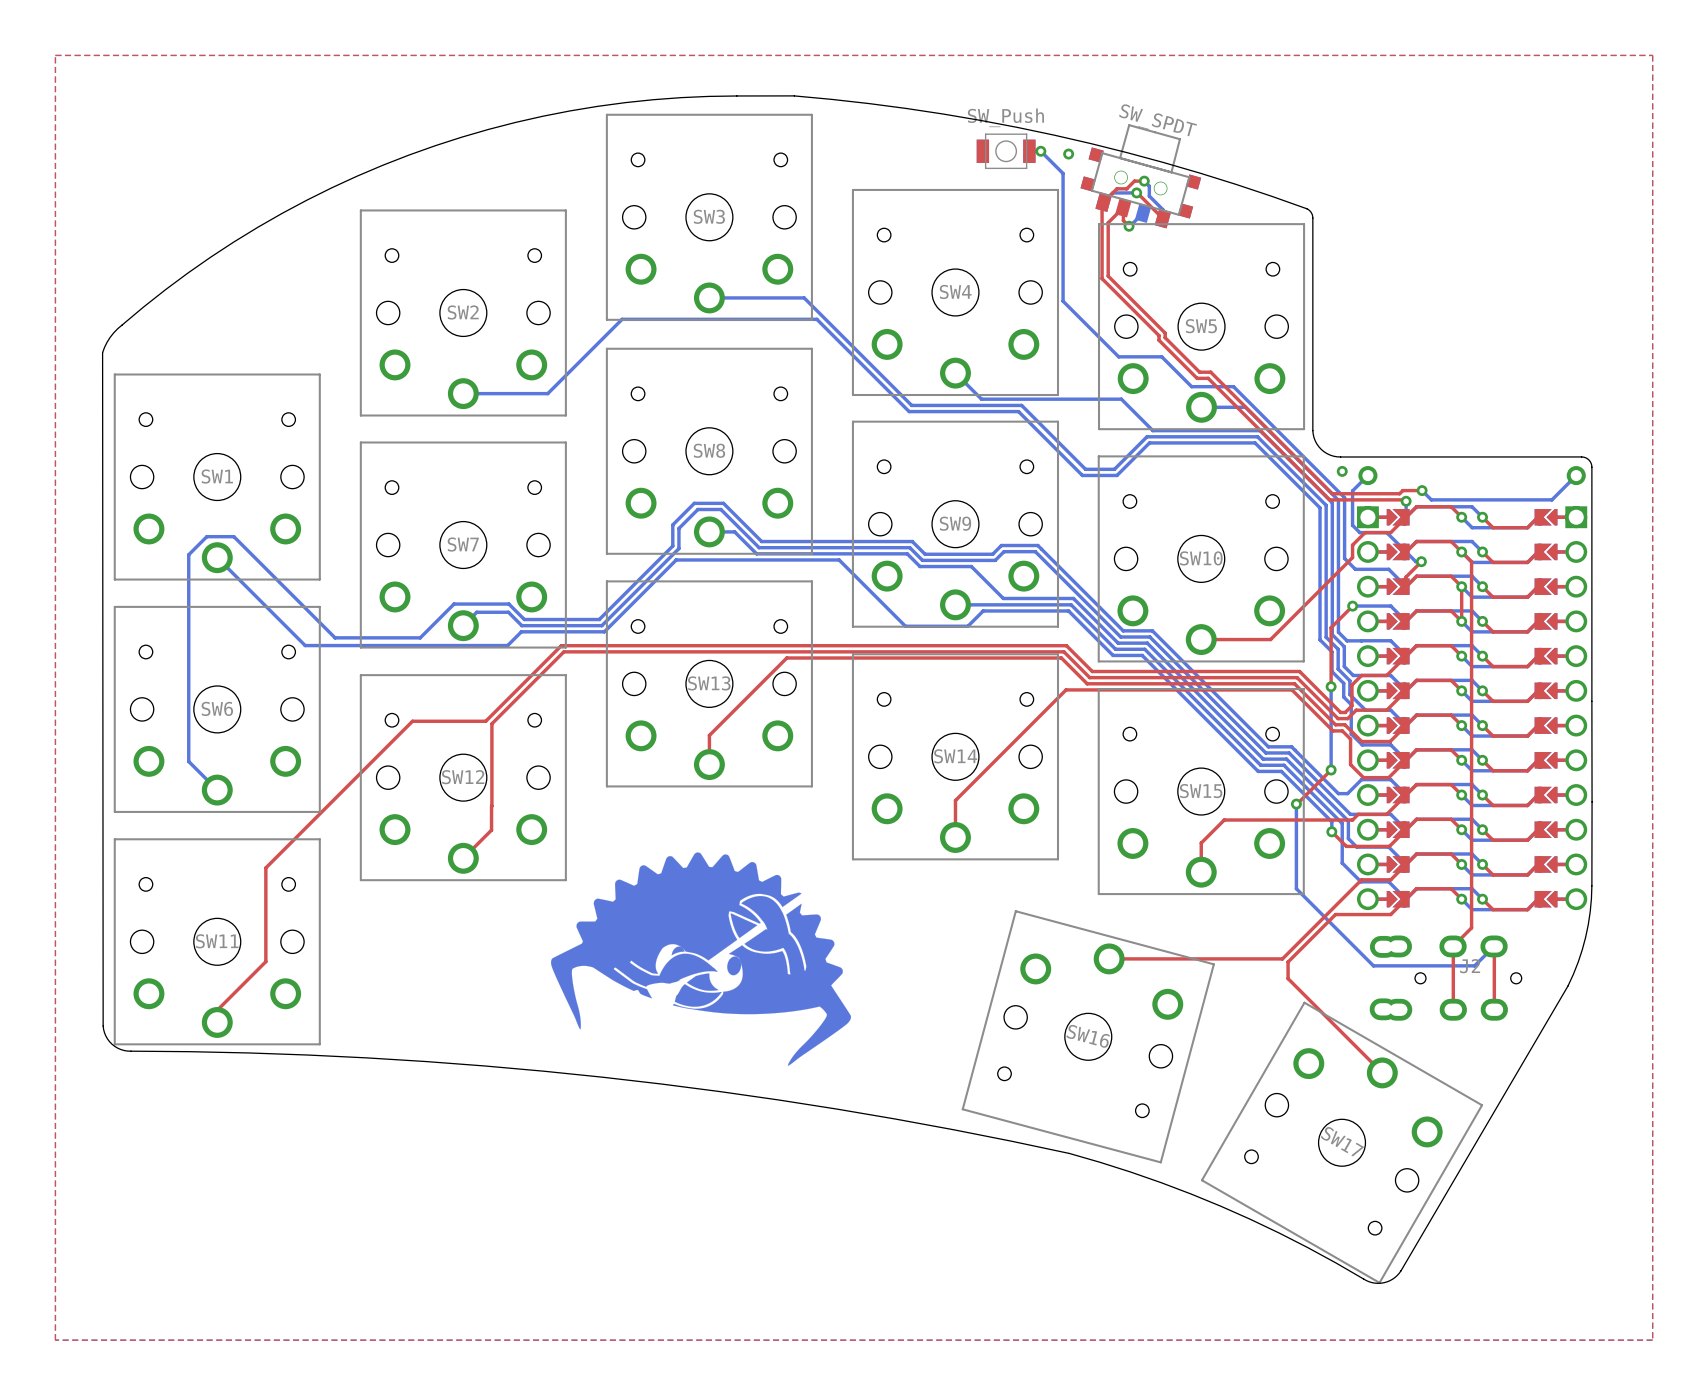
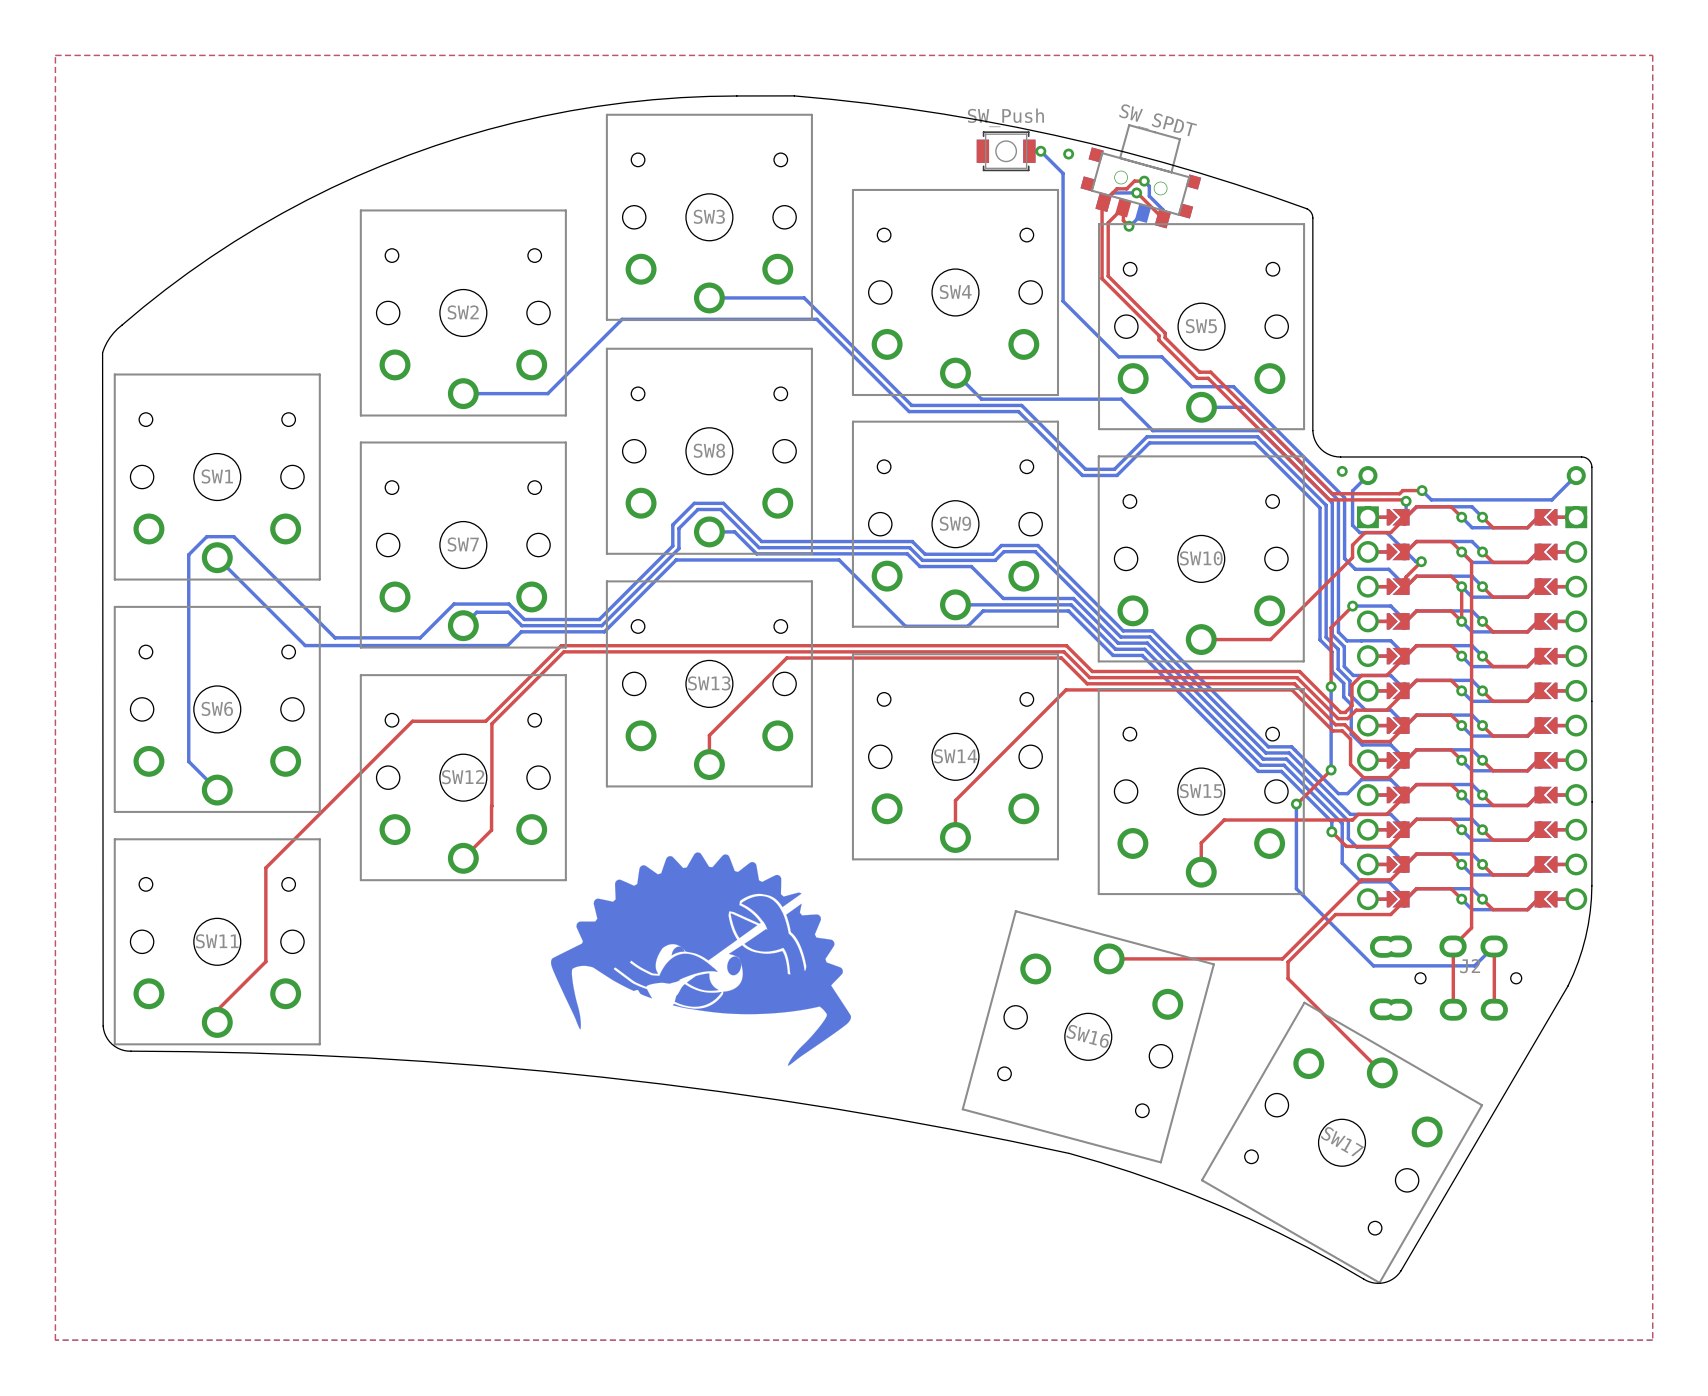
part footprint: [976, 133, 1036, 170] -> [976, 131, 1036, 172]

